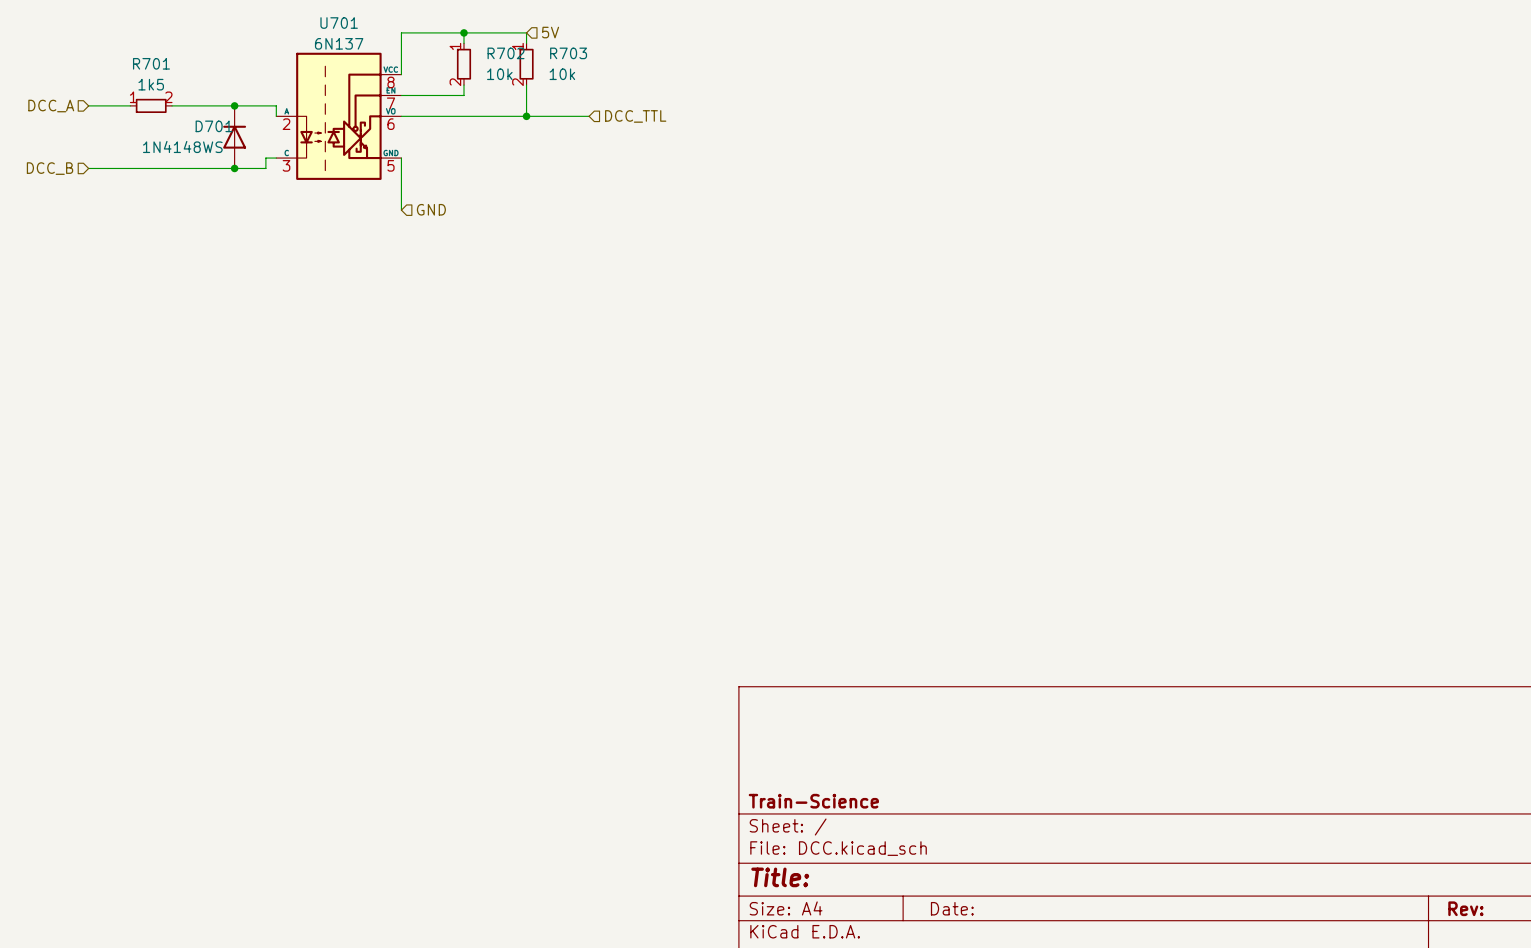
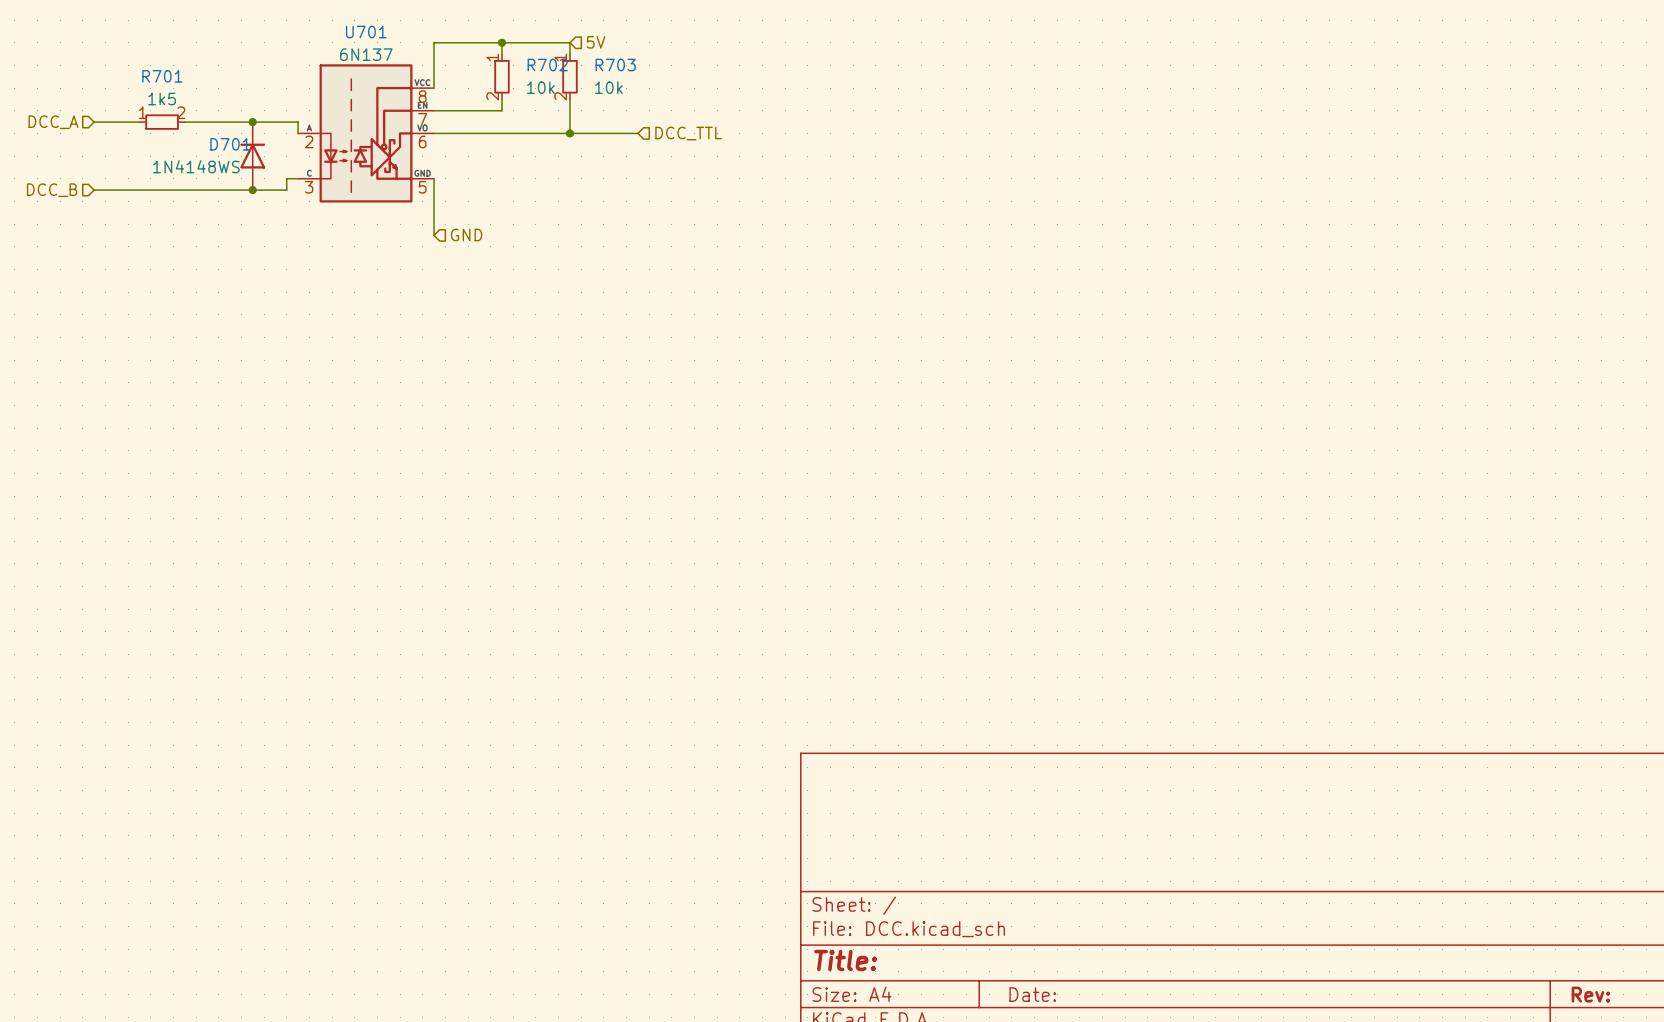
title block: Train-Science (813, 801) -> none

